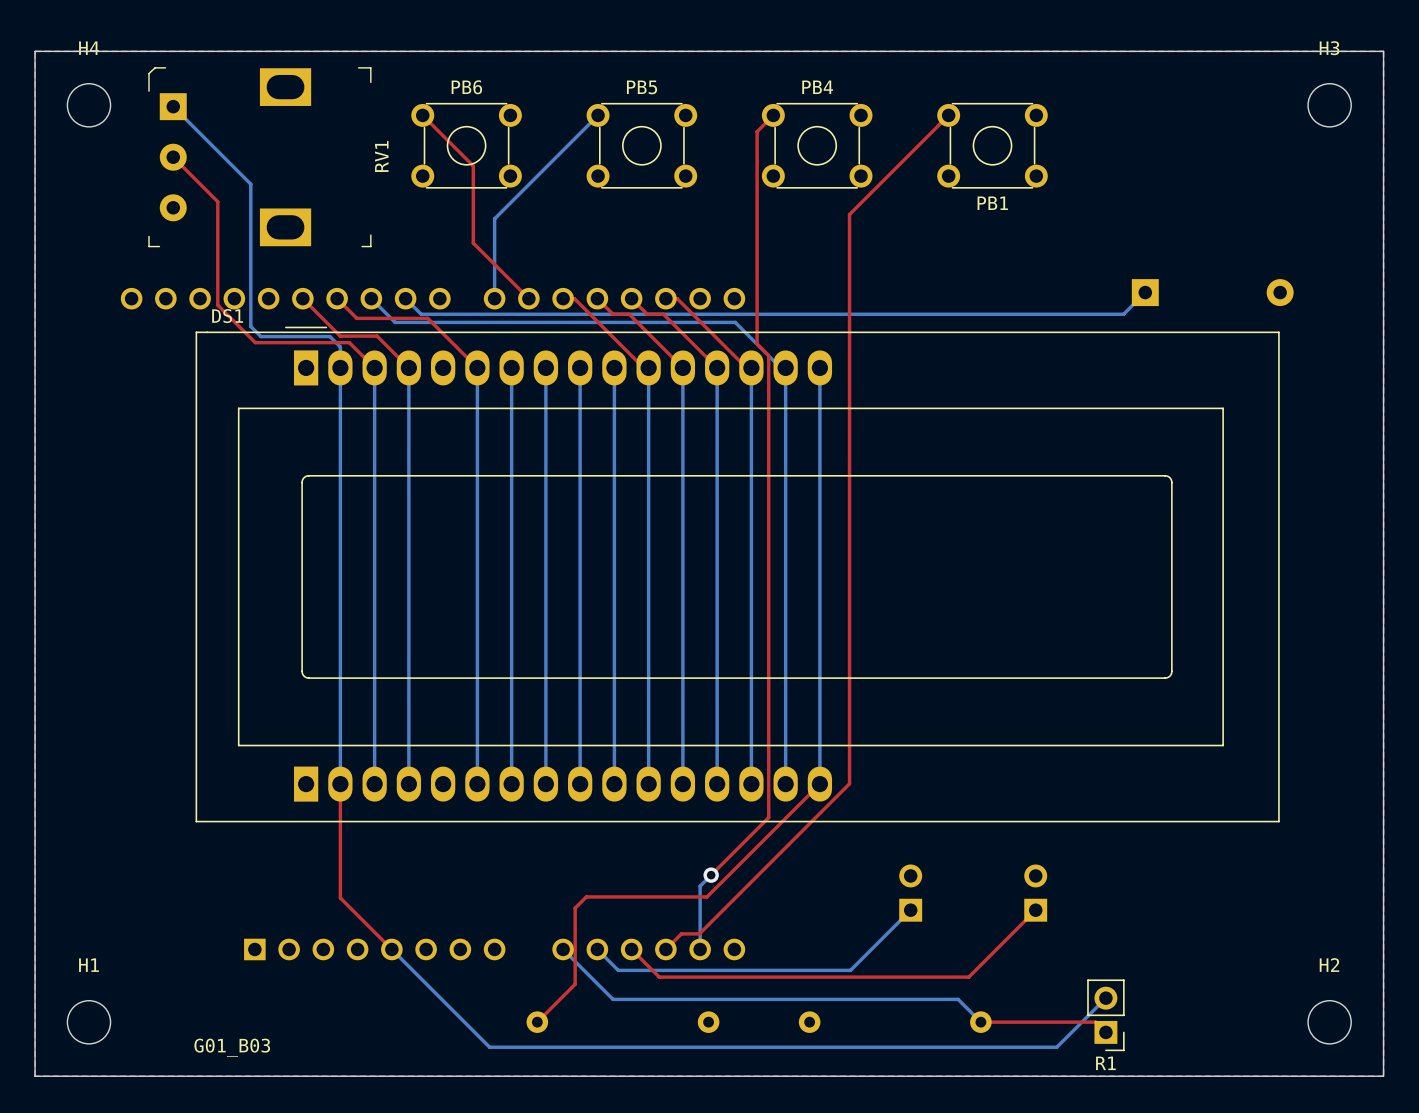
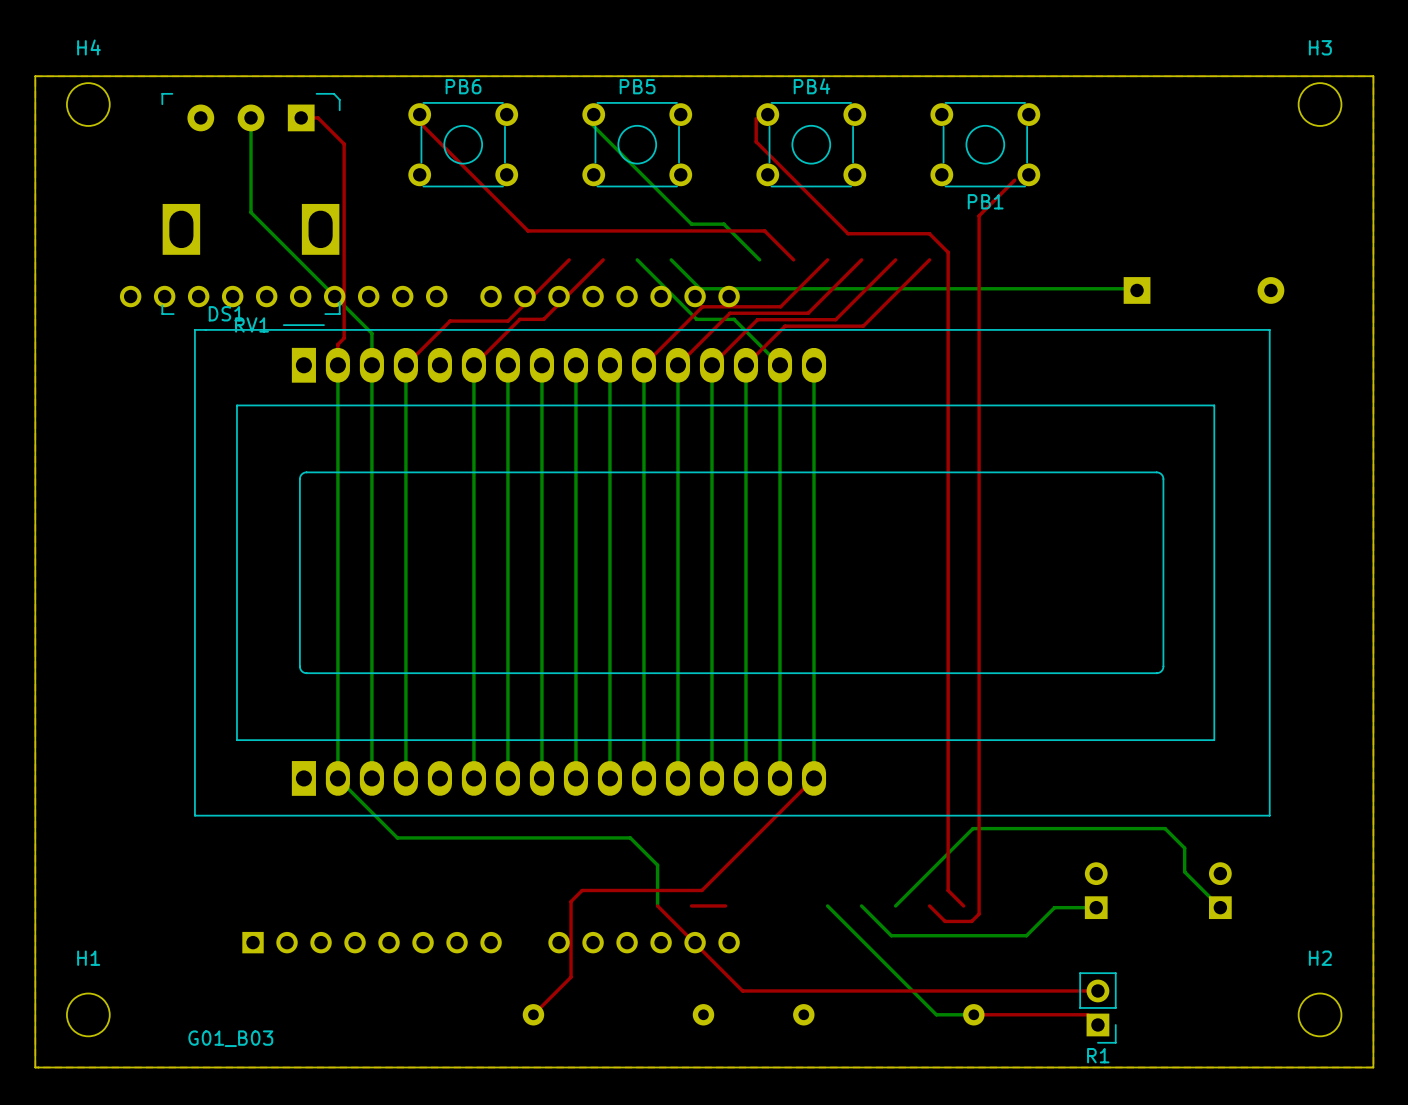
board edge: (35, 51) (35, 1076) (1383, 1076) (1383, 51) (35, 51) -> (35, 76) (35, 1067) (1373, 1067) (1373, 76) (35, 76)
bottom track: (173, 106) (250, 184) (250, 326) (260, 336) (329, 336) (340, 346) (340, 367) -> none
top track: (422, 115) (473, 165) (473, 243) (528, 298) -> none
bottom track: (598, 115) (494, 218) (494, 298) -> none
top track: (773, 115) (757, 131) (757, 343) (768, 355) (768, 817) (711, 875) -> none
top track: (948, 115) (849, 214) (849, 783) (699, 933) (681, 933) (665, 949) -> none
bottom track: none -> (251, 117) (251, 212) (371, 333) (371, 365)
top track: none -> (301, 117) (318, 117) (344, 144) (344, 338) (337, 344) (337, 365)
top track: none -> (415, 118) (528, 230) (764, 230) (793, 259)
bottom track: none -> (586, 118) (691, 224) (723, 224) (759, 259)
top track: none -> (756, 118) (756, 141) (848, 233) (929, 233) (948, 252) (948, 890) (963, 905)
top track: (173, 157) (217, 201) (217, 305) (255, 342) (349, 342) (374, 367) -> none
RV1 rotation: 0° (259, 157) -> 90° clockwise (251, 203)
top track: none -> (1014, 180) (979, 215) (979, 914) (971, 921) (945, 921) (929, 905)
bottom track: (1145, 292) (1123, 314) (421, 314) (405, 298) -> (1137, 290) (1135, 288) (700, 288) (671, 259)
top track: (302, 298) (340, 336) (377, 336) (408, 367) -> (569, 259) (508, 321) (450, 321) (405, 365)
top track: (337, 298) (356, 318) (427, 318) (477, 367) -> (603, 259) (543, 319) (519, 319) (473, 365)
bottom track: (371, 298) (395, 322) (735, 322) (780, 367) (785, 367) -> (637, 259) (696, 319) (734, 319) (779, 365)
top track: (563, 298) (574, 298) (643, 367) (648, 367) -> (827, 259) (780, 306) (702, 306) (643, 365)
top track: (597, 298) (612, 314) (629, 314) (682, 367) -> (861, 259) (808, 313) (730, 313) (677, 365)
top track: (631, 298) (647, 314) (663, 314) (717, 367) -> (895, 259) (835, 319) (757, 319) (711, 365)
top track: (665, 298) (677, 298) (746, 367) (751, 367) -> (929, 259) (863, 326) (785, 326) (745, 365)
top track: (340, 784) (340, 897) (391, 949) -> none
bottom track: none -> (337, 778) (397, 837) (630, 837) (657, 865) (657, 905)
bottom track: (711, 875) (700, 886) (700, 949) -> none
via: (711, 875) -> none
part: (910, 893) -> none
part position: (1035, 893) -> (1096, 890)
part: none -> (1220, 890)
bottom track: (910, 910) (850, 970) (618, 970) (597, 949) -> none
top track: (1035, 910) (968, 977) (659, 977) (631, 949) -> none
top track: none -> (657, 905) (742, 990) (1097, 990)
top track: none -> (691, 905) (725, 905)
bottom track: none -> (861, 905) (891, 935) (1026, 935) (1054, 907) (1096, 907)
bottom track: none -> (895, 905) (972, 828) (1165, 828) (1184, 848) (1184, 871) (1220, 907)
bottom track: (391, 949) (489, 1047) (1056, 1047) (1105, 998) -> none
bottom track: (563, 949) (613, 999) (958, 999) (980, 1022) -> (827, 905) (936, 1014) (973, 1014)

